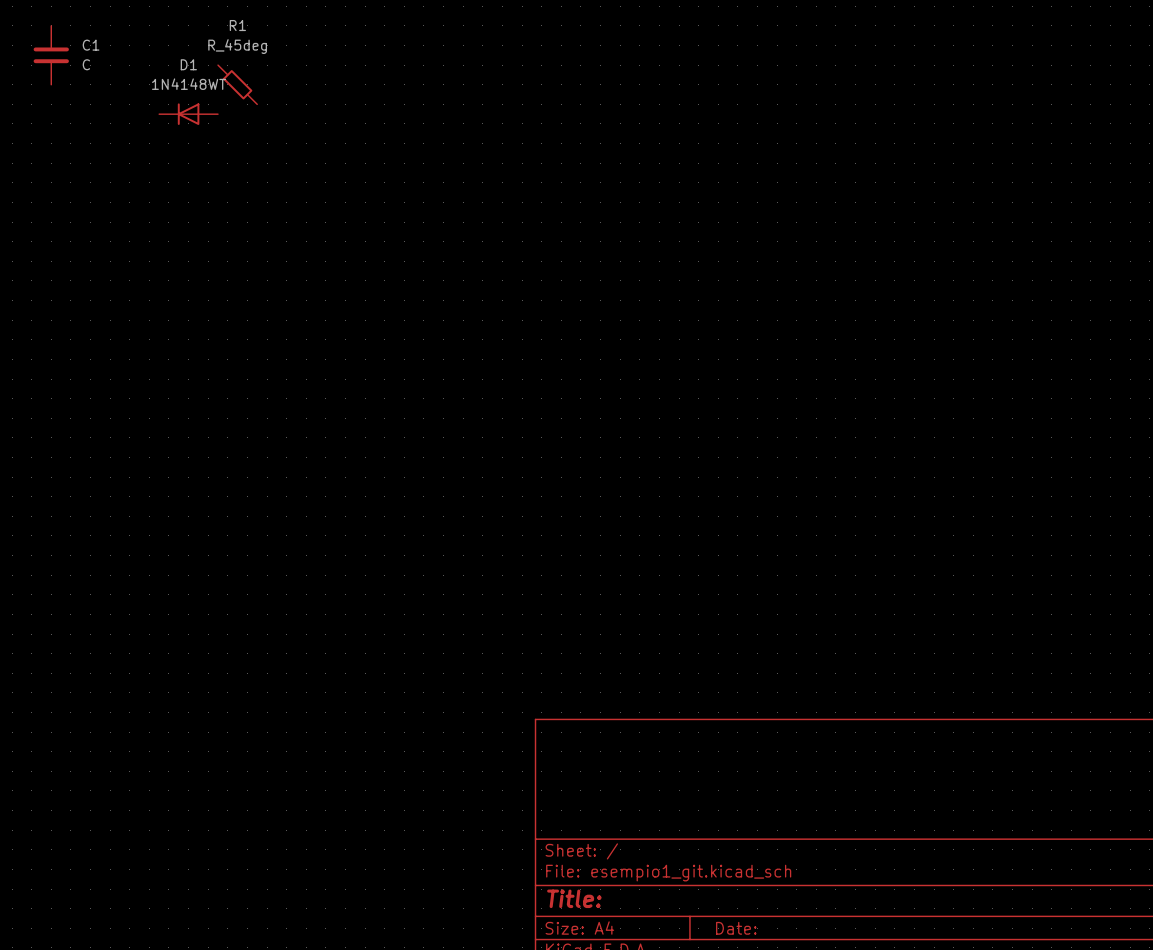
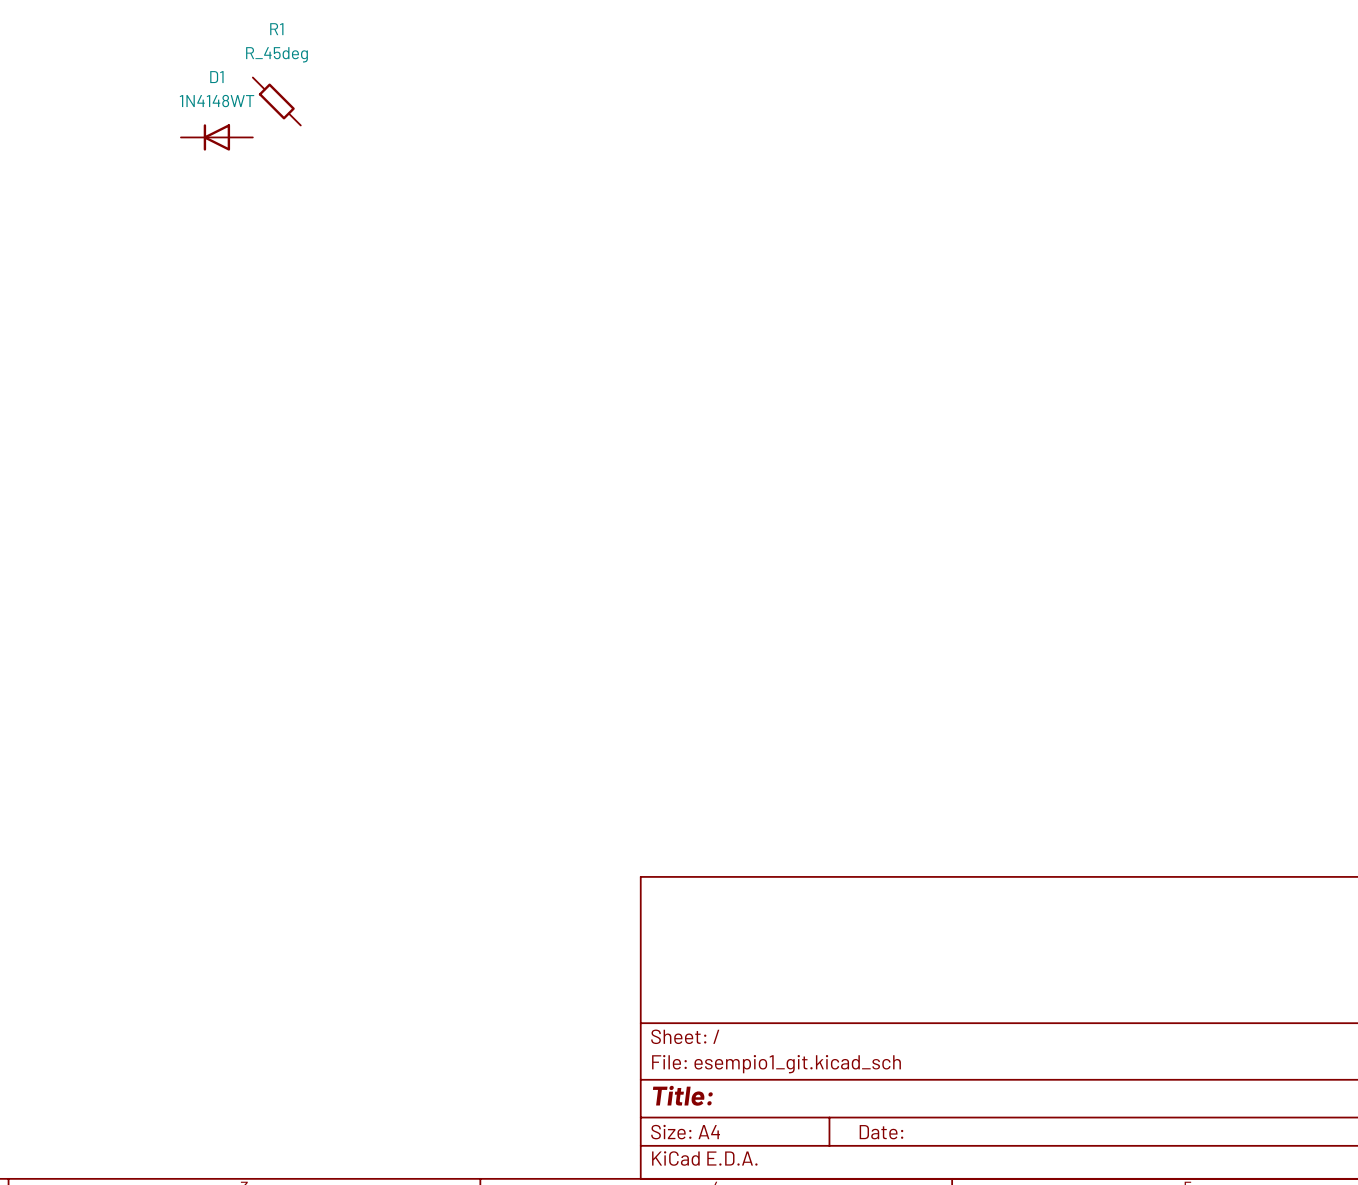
C1: C (51, 55) -> none

